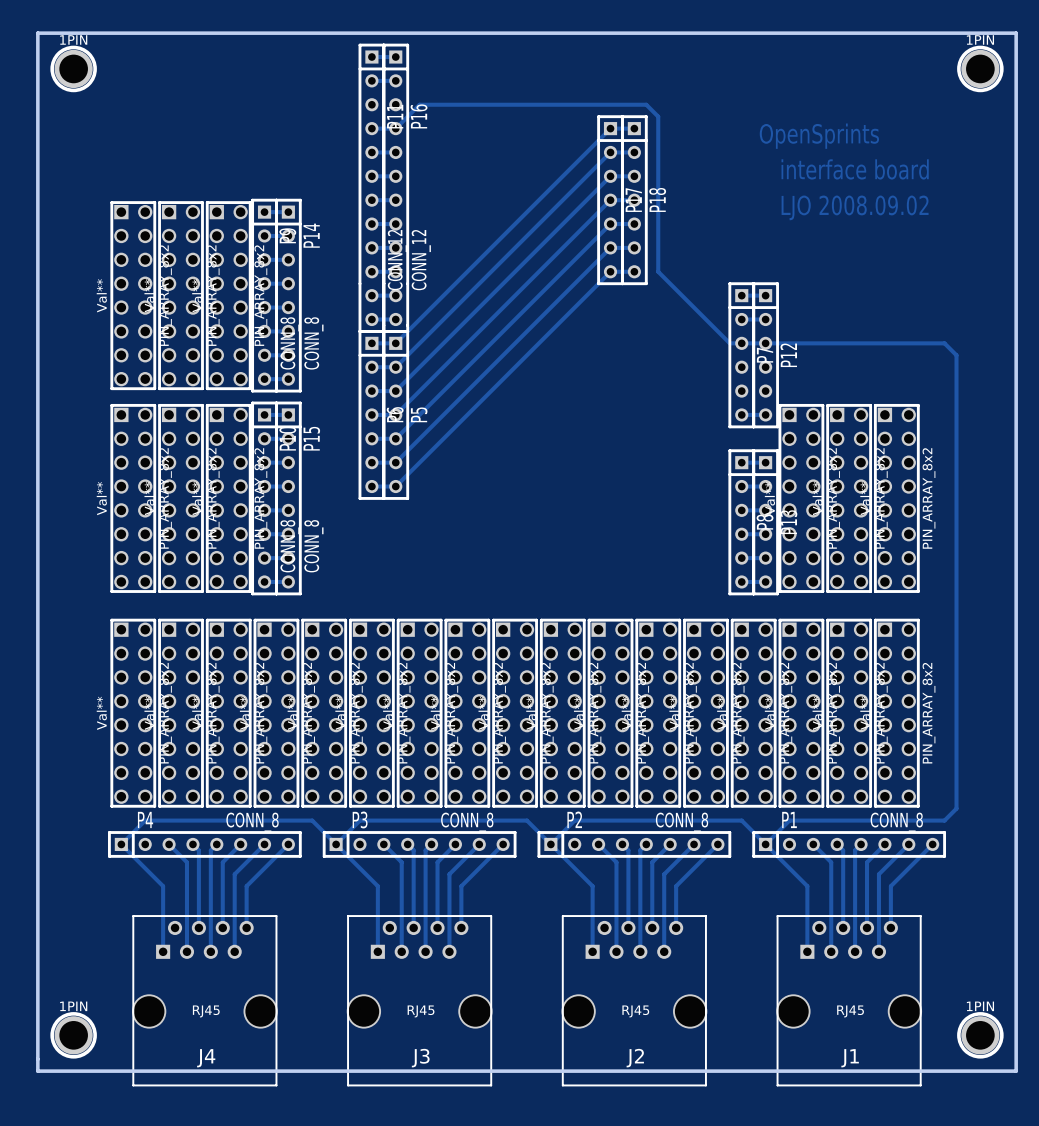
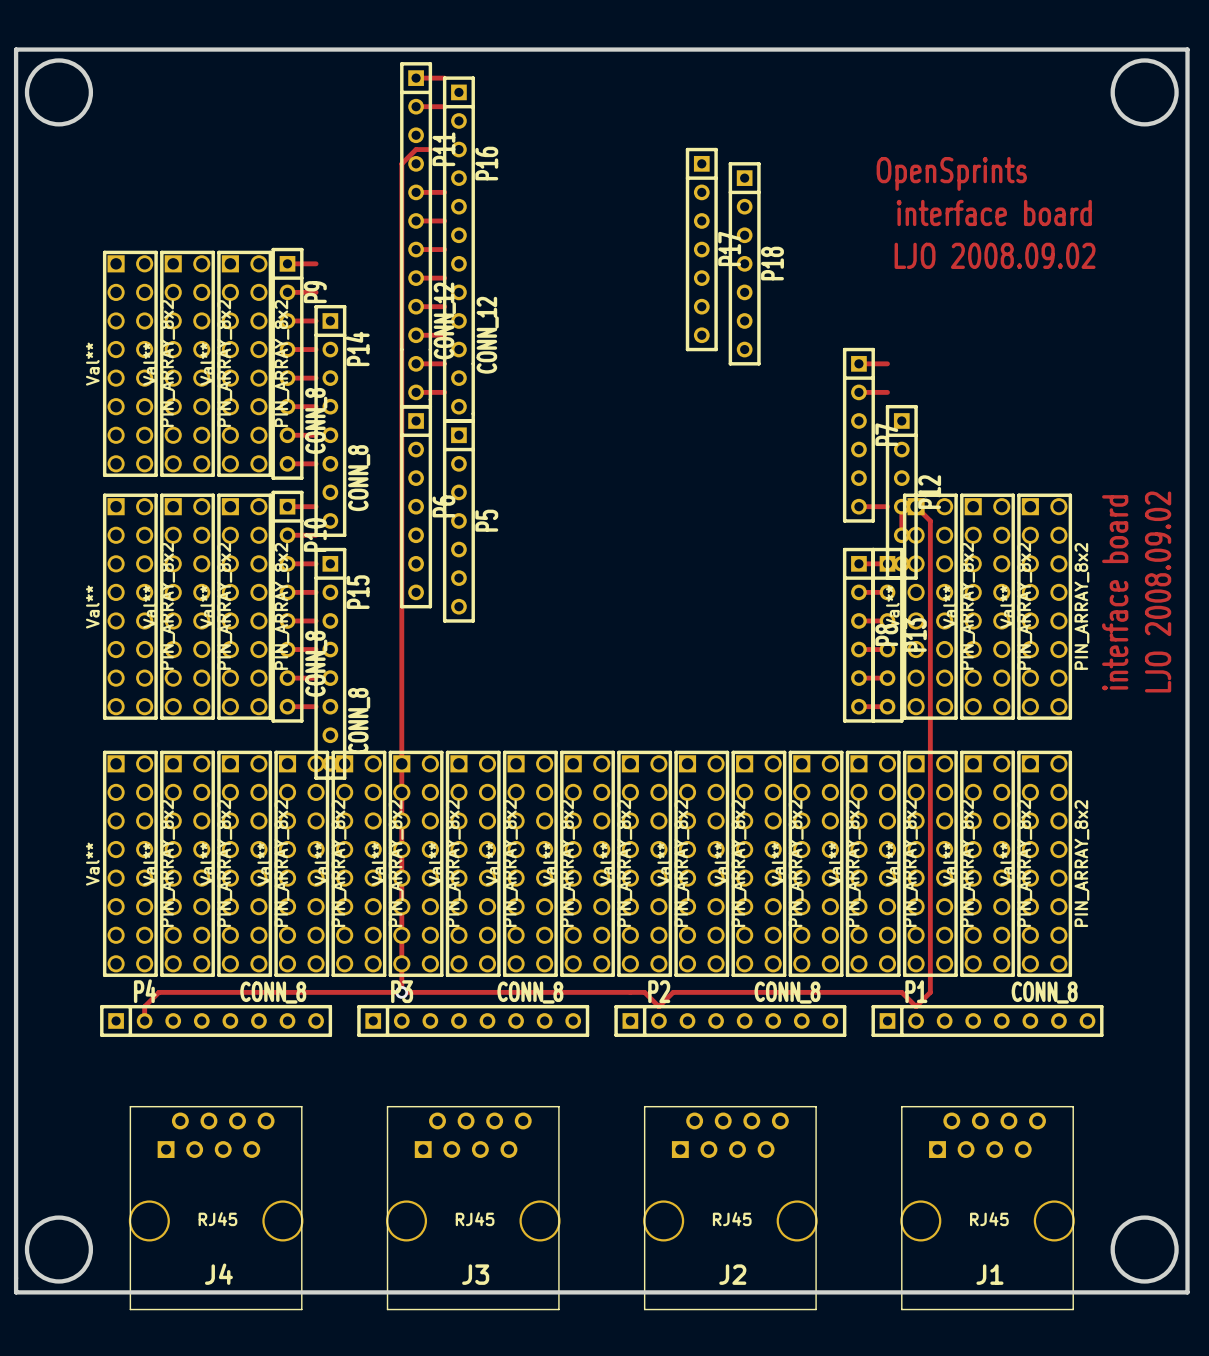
round board edge: none -> [24, 58, 94, 127]
round board edge: none -> [1110, 58, 1179, 127]
1PIN: (73, 68) -> none
1PIN: (980, 68) -> none
track: (371, 128) (395, 128) (419, 104) (646, 104) (658, 116) (658, 271) (729, 343) (944, 343) (956, 355) (956, 808) (944, 820) (789, 820) (765, 844) -> none
track: (634, 128) (610, 128) (395, 343) (371, 343) -> none
track: (634, 152) (610, 152) (395, 367) (371, 367) -> none
track: (634, 176) (610, 176) (395, 391) (371, 391) -> none
P16 position: (395, 188) -> (458, 249)
track: (634, 200) (610, 200) (395, 414) (371, 414) -> none
P18 position: (634, 200) -> (744, 263)
track: (634, 224) (610, 224) (395, 438) (371, 438) -> none
track: (634, 247) (610, 247) (395, 462) (371, 462) -> none
track: (634, 271) (610, 271) (395, 486) (371, 486) -> none
P14 position: (288, 295) -> (330, 420)
P12 position: (765, 355) -> (901, 492)
P5 position: (395, 414) -> (458, 520)
text: none -> interface board (1115, 592)
text: none -> LJO 2008.09.02 (1158, 591)
P15 position: (288, 498) -> (330, 663)
track: (157, 820) (145, 820) (121, 844) (163, 886) (163, 951) -> (158, 992) (144, 1006) (144, 1020)
track: (312, 820) (377, 886) (377, 951) -> (344, 992) (401, 992) (401, 163) (416, 149) (430, 149)
track: (359, 820) (336, 844) -> none
via: none -> (401, 992)
track: (527, 820) (592, 886) (592, 951) -> none
track: (586, 820) (574, 820) (550, 844) -> (673, 992) (658, 1006) (644, 992) (601, 992)
track: (741, 820) (807, 886) (807, 951) -> (858, 992) (901, 992) (916, 1006) (930, 992) (930, 520) (916, 506) (901, 506) (901, 535)
track: (169, 844) (186, 862) (186, 951) -> none
track: (192, 844) (198, 850) (198, 927) -> none
track: (216, 844) (210, 850) (210, 951) -> none
track: (240, 844) (222, 862) (222, 927) -> none
track: (264, 844) (234, 874) (234, 951) -> none
track: (288, 844) (246, 886) (246, 927) -> none
track: (383, 844) (401, 862) (401, 951) -> none
track: (407, 844) (413, 850) (413, 927) -> none
track: (431, 844) (425, 850) (425, 951) -> none
track: (455, 844) (437, 862) (437, 927) -> none
track: (479, 844) (449, 874) (449, 951) -> none
track: (503, 844) (461, 886) (461, 927) -> none
track: (598, 844) (616, 862) (616, 951) -> none
track: (622, 844) (628, 850) (628, 927) -> none
track: (646, 844) (640, 850) (640, 951) -> none
track: (670, 844) (652, 862) (652, 927) -> none
track: (694, 844) (664, 874) (664, 951) -> none
track: (717, 844) (676, 886) (676, 927) -> none
track: (813, 844) (831, 862) (831, 951) -> none
track: (837, 844) (843, 850) (843, 927) -> none
track: (861, 844) (855, 850) (855, 951) -> none
track: (884, 844) (867, 862) (867, 927) -> none
track: (908, 844) (878, 874) (878, 951) -> none
track: (932, 844) (890, 886) (890, 927) -> none
round board edge: none -> [24, 1215, 94, 1284]
round board edge: none -> [1110, 1215, 1179, 1284]
1PIN: (73, 1035) -> none
1PIN: (980, 1035) -> none

